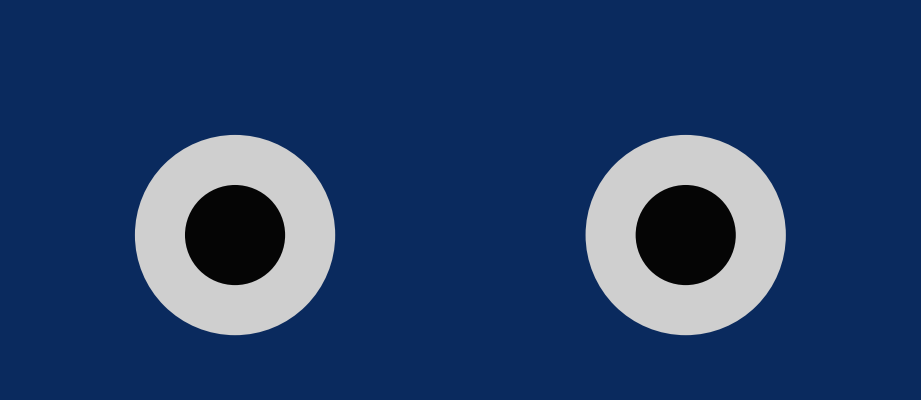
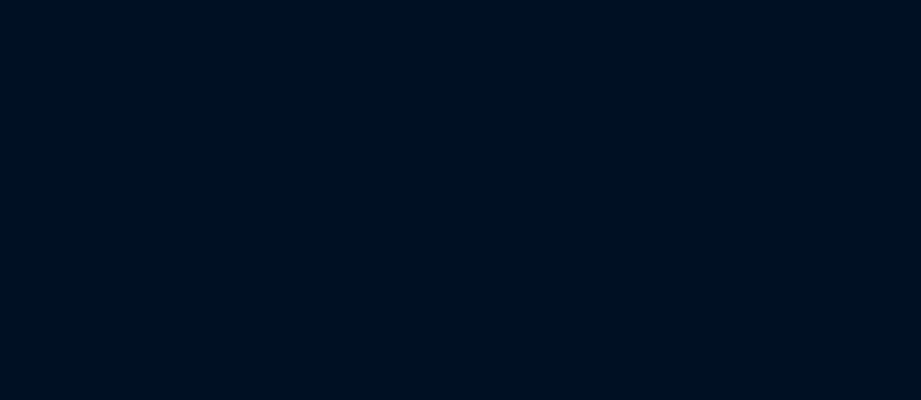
part: (235, 235) -> none
part: (685, 235) -> none

